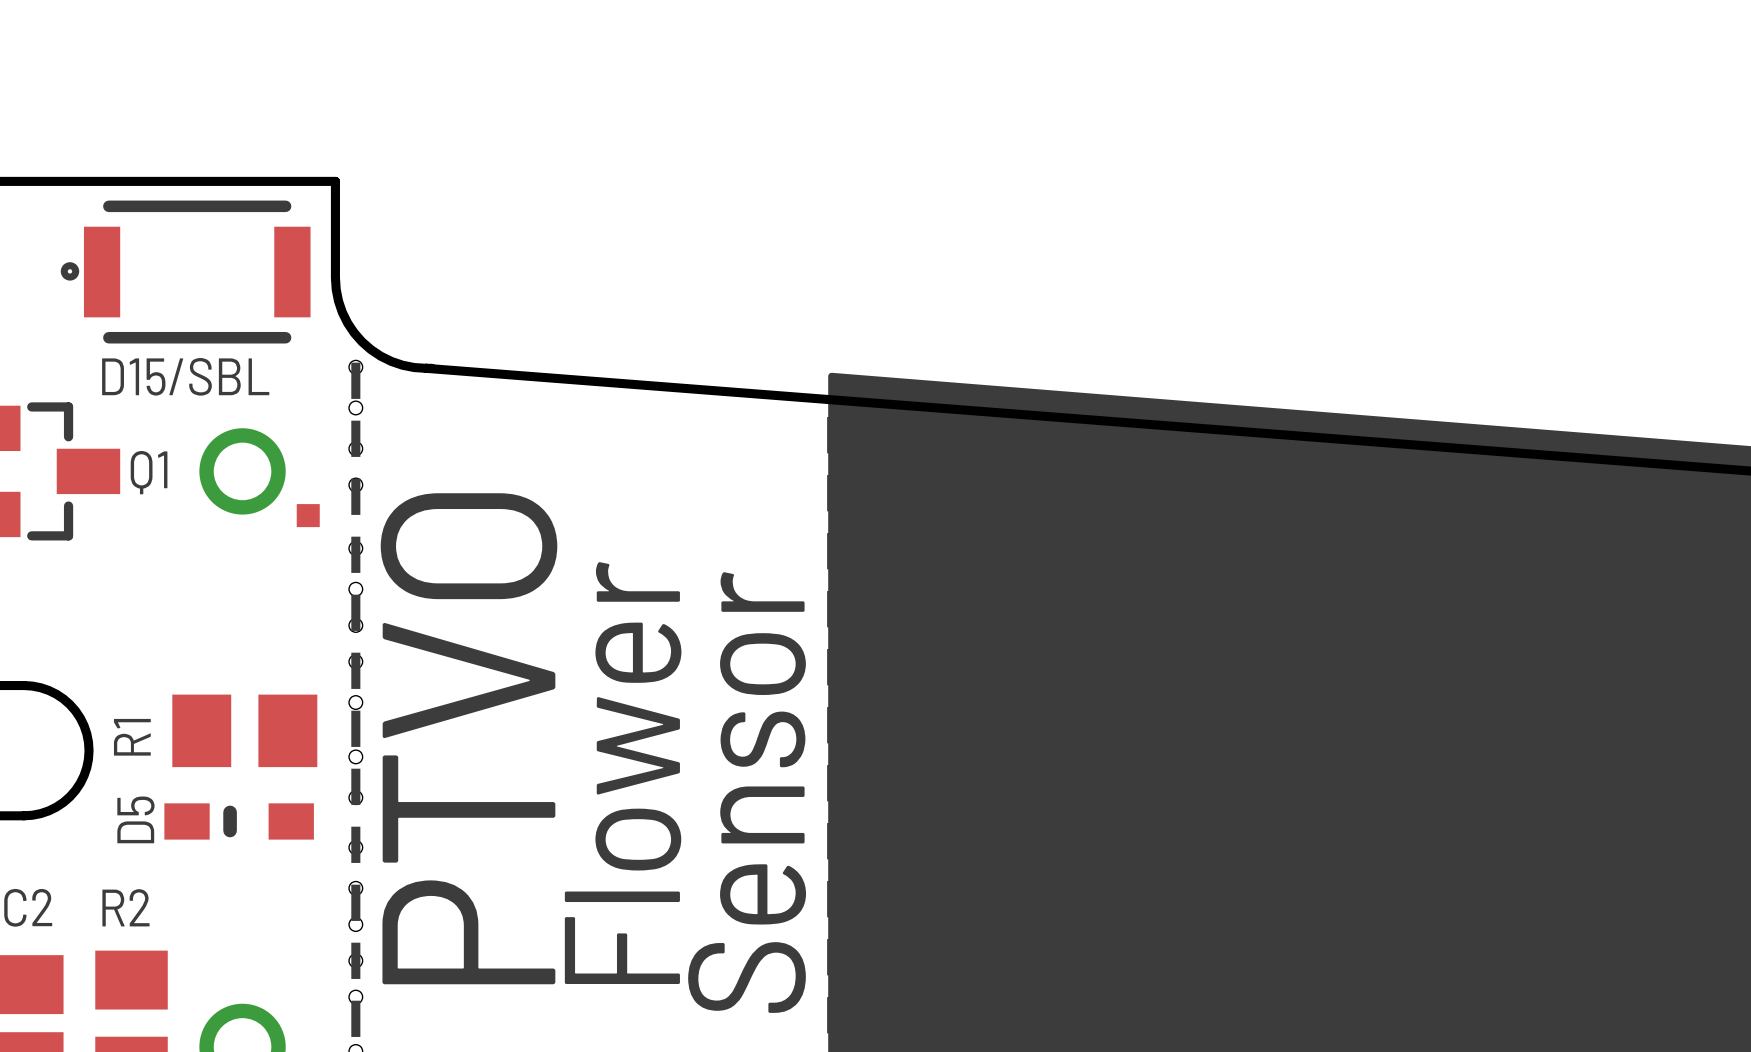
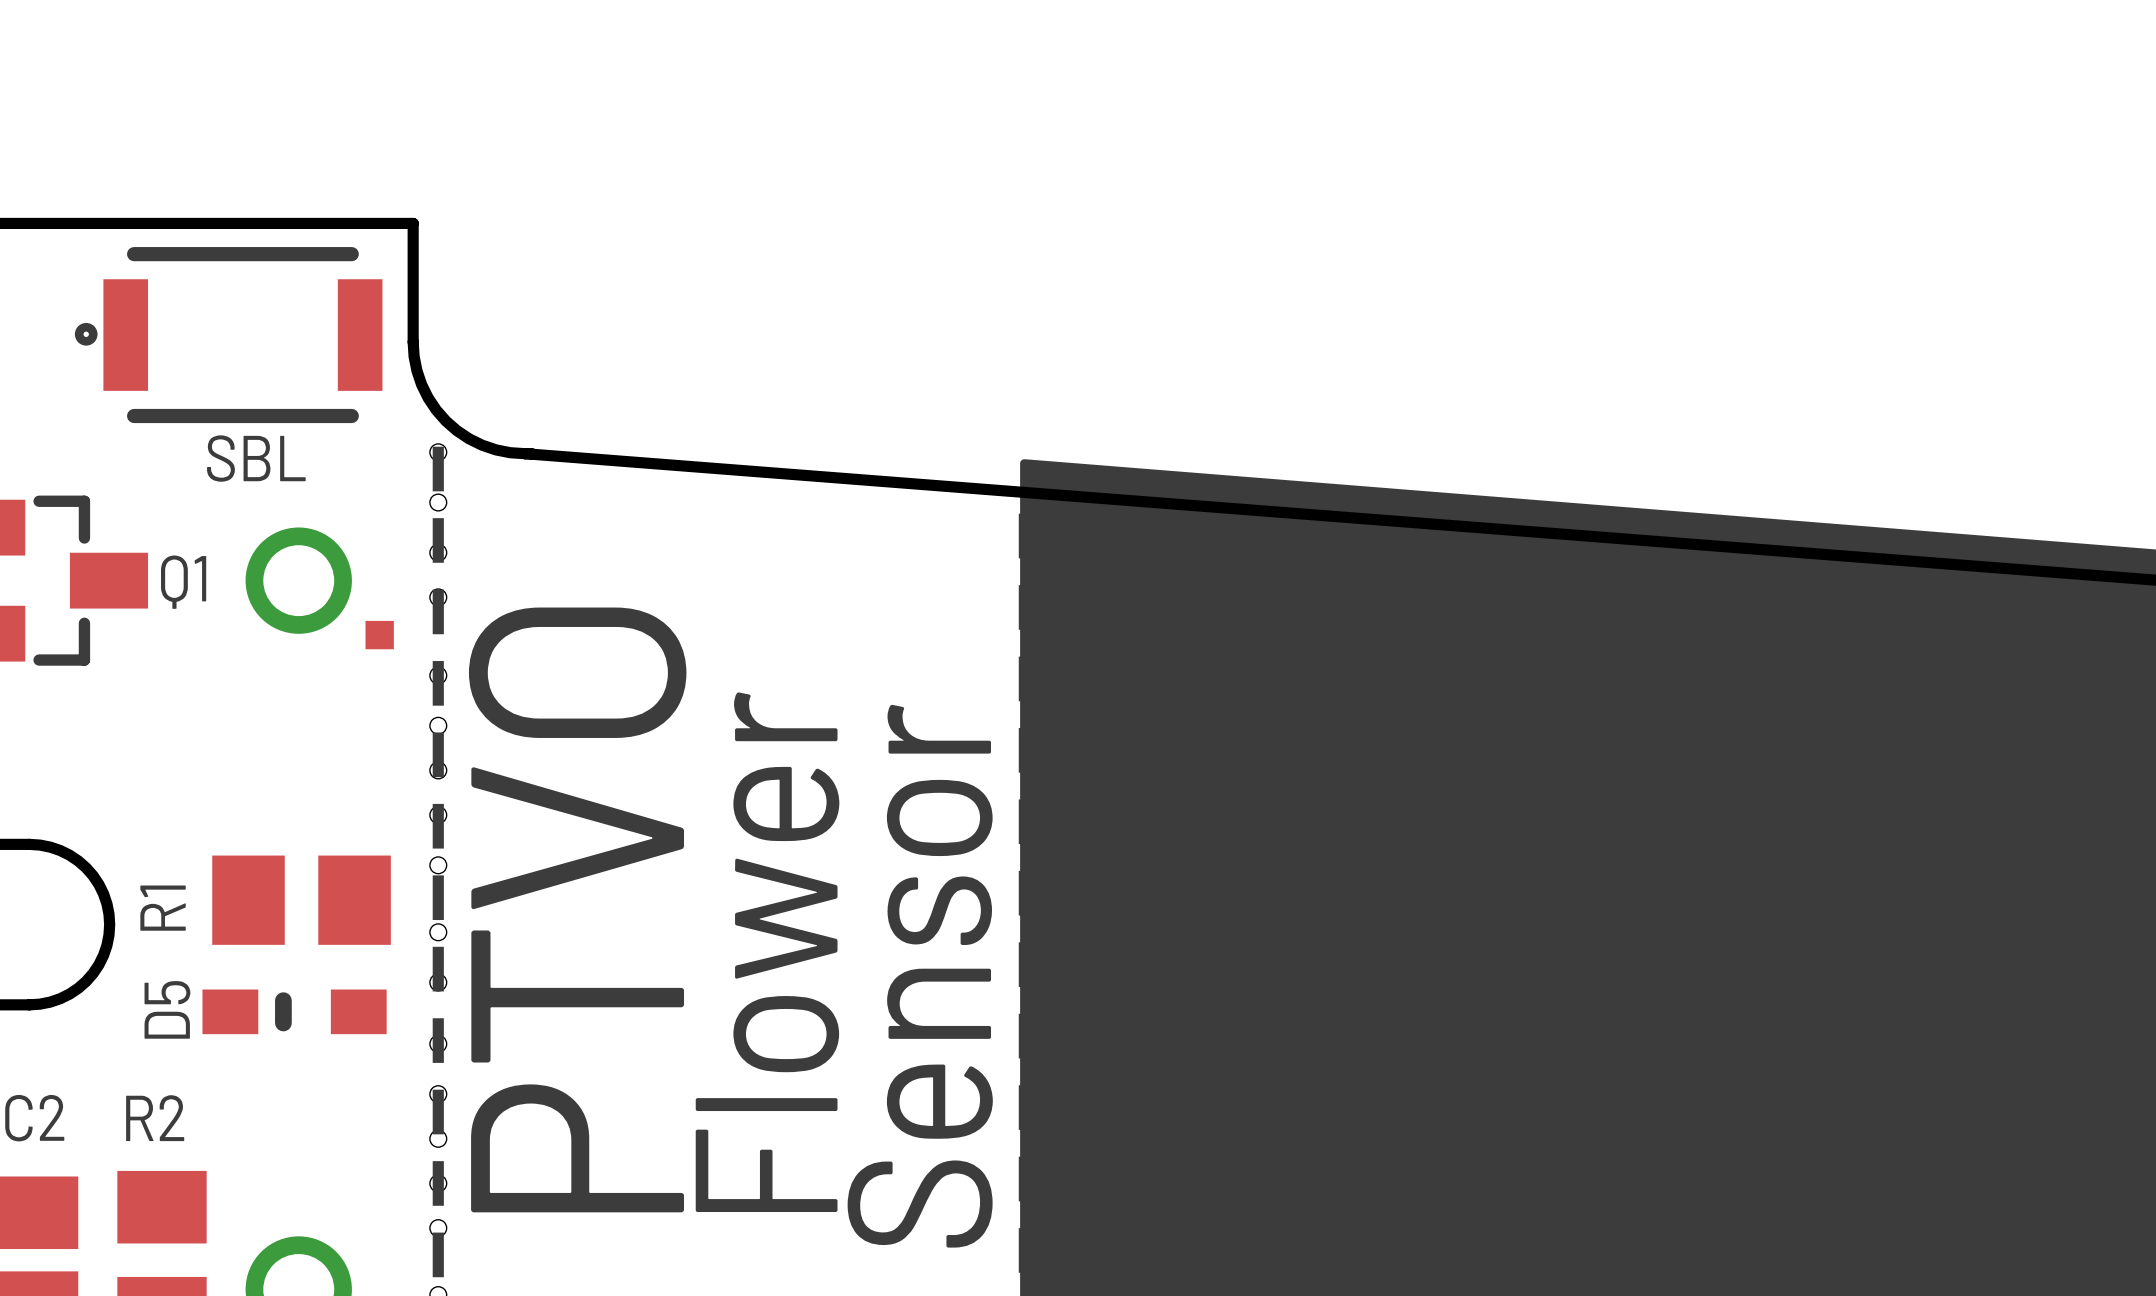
text: none -> SBL (256, 458)
text: D15/SBL (185, 376) -> none

